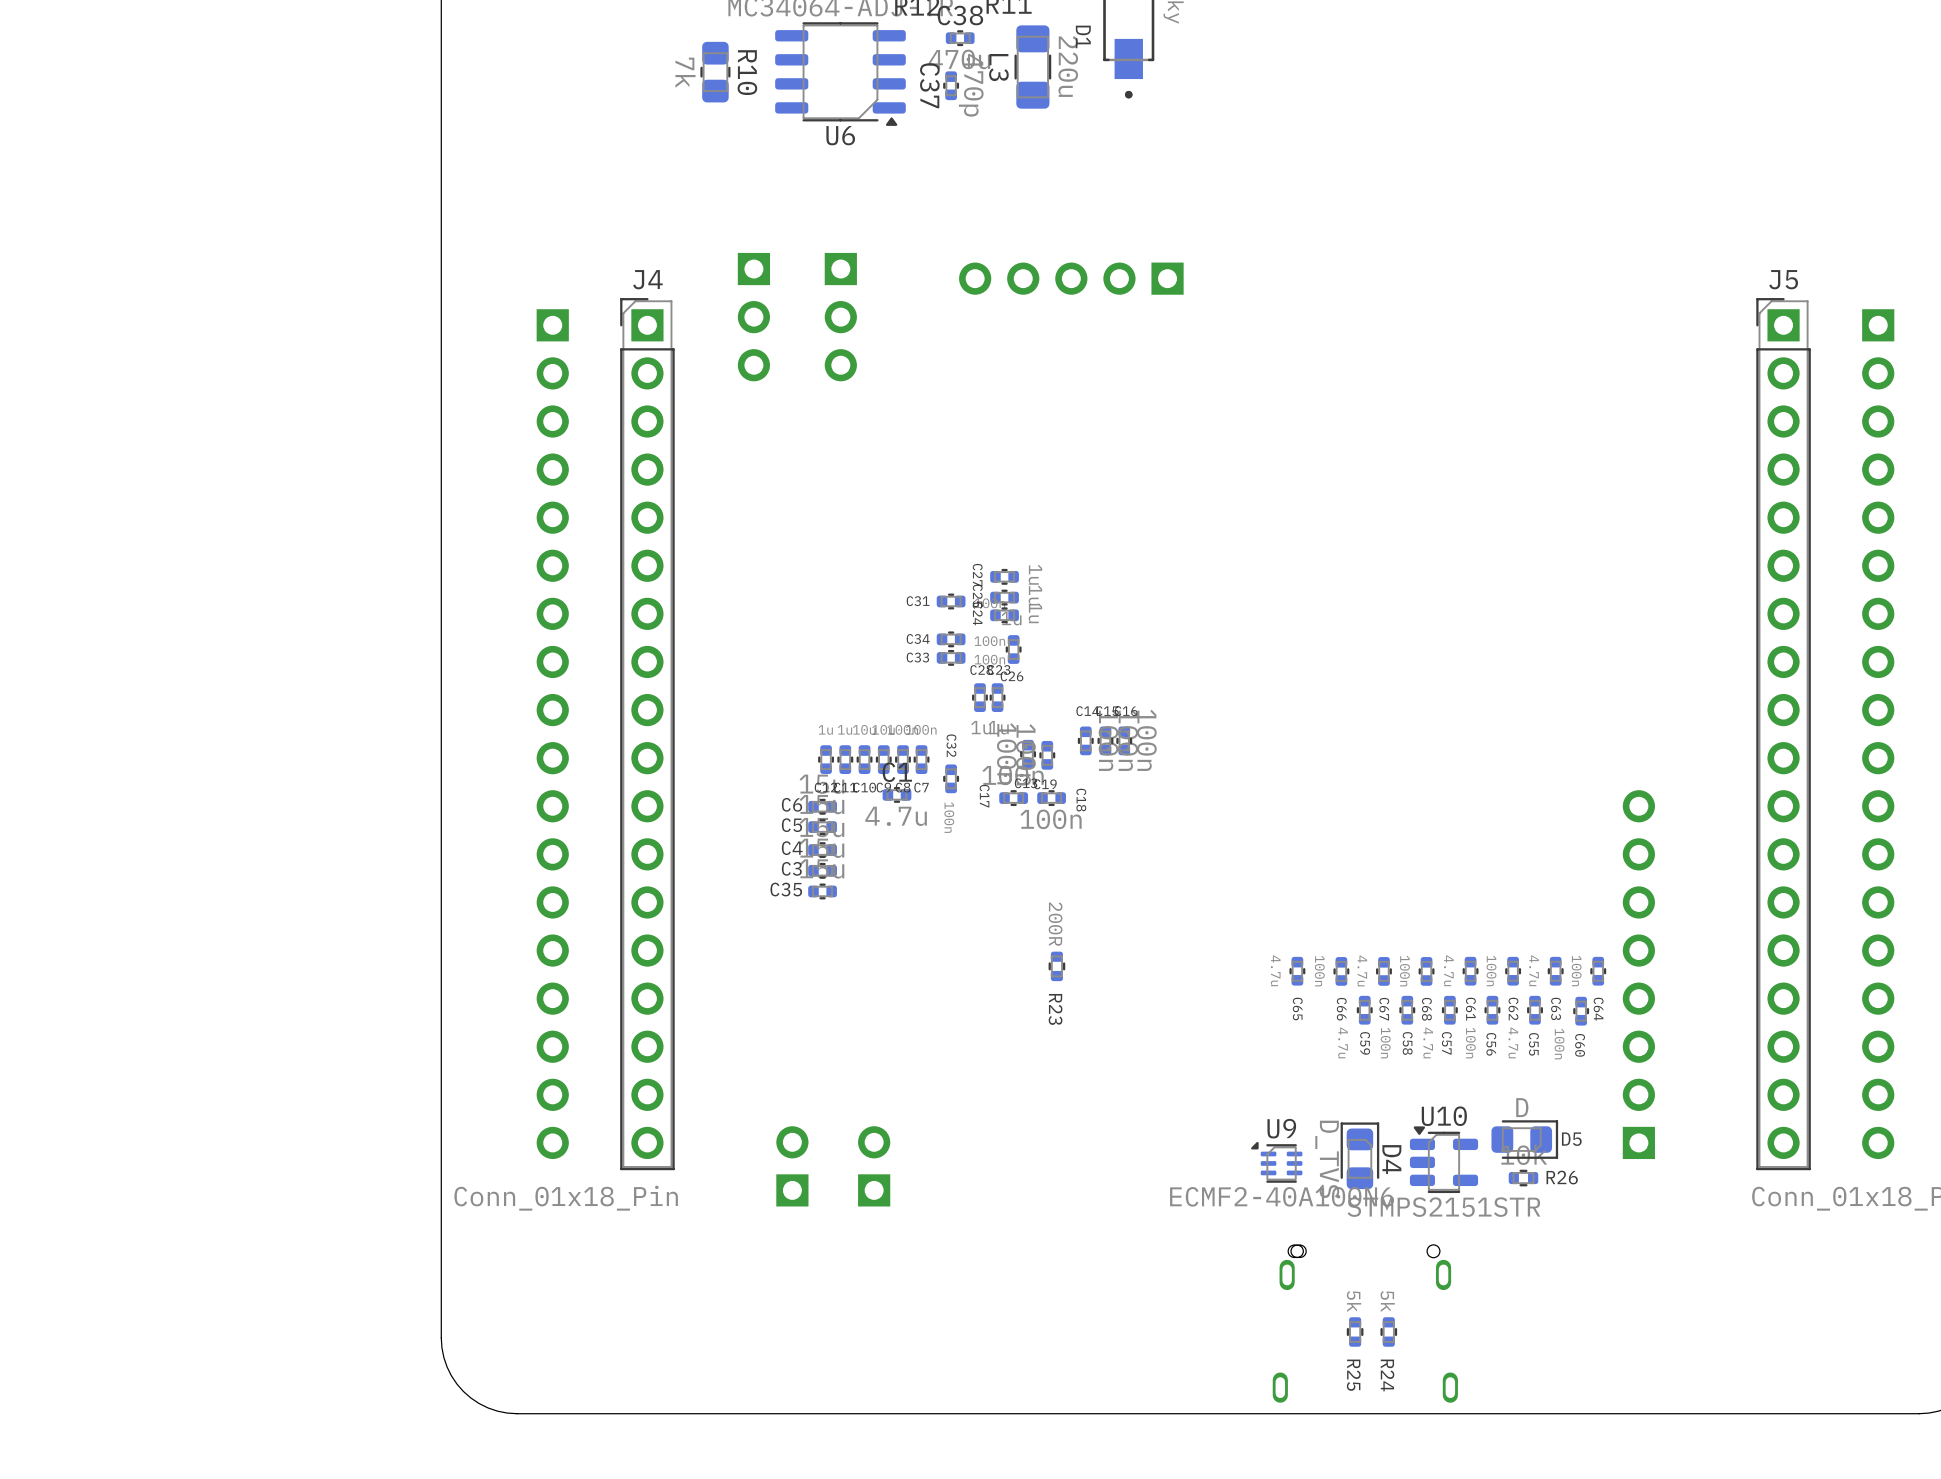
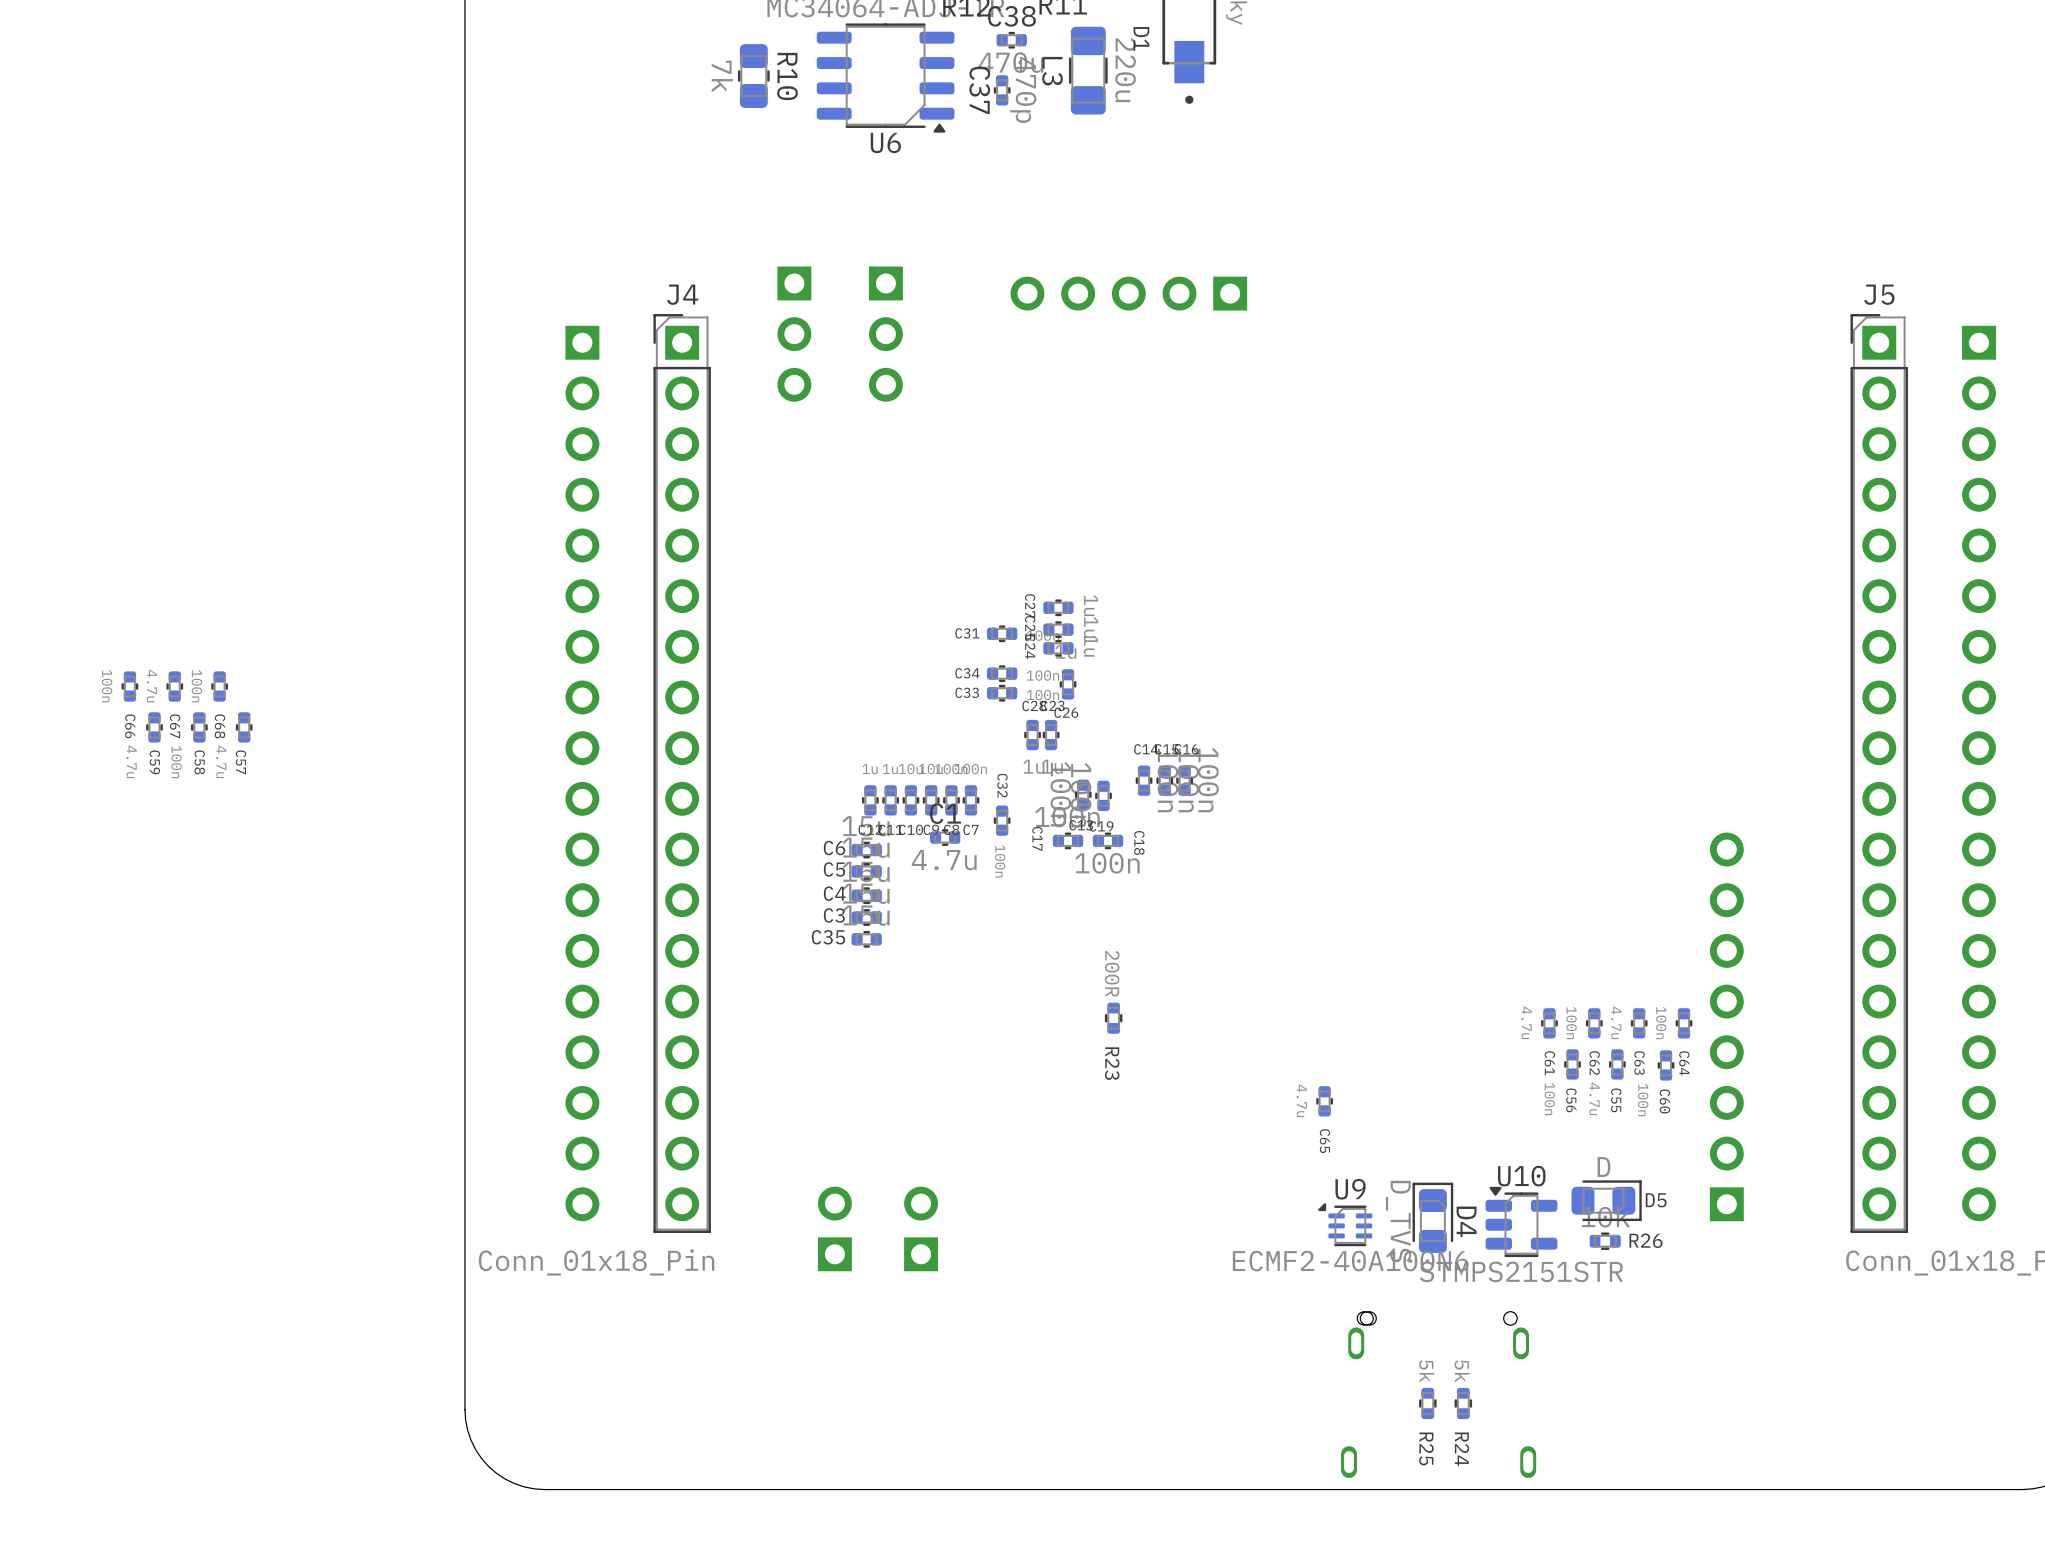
C65 position: (1297, 971) -> (1324, 1101)
C66 position: (1341, 971) -> (129, 686)
C67 position: (1383, 971) -> (174, 686)
C68 position: (1426, 971) -> (219, 686)
C59 position: (1364, 1010) -> (154, 727)
C58 position: (1407, 1010) -> (199, 727)
C57 position: (1449, 1010) -> (244, 727)

